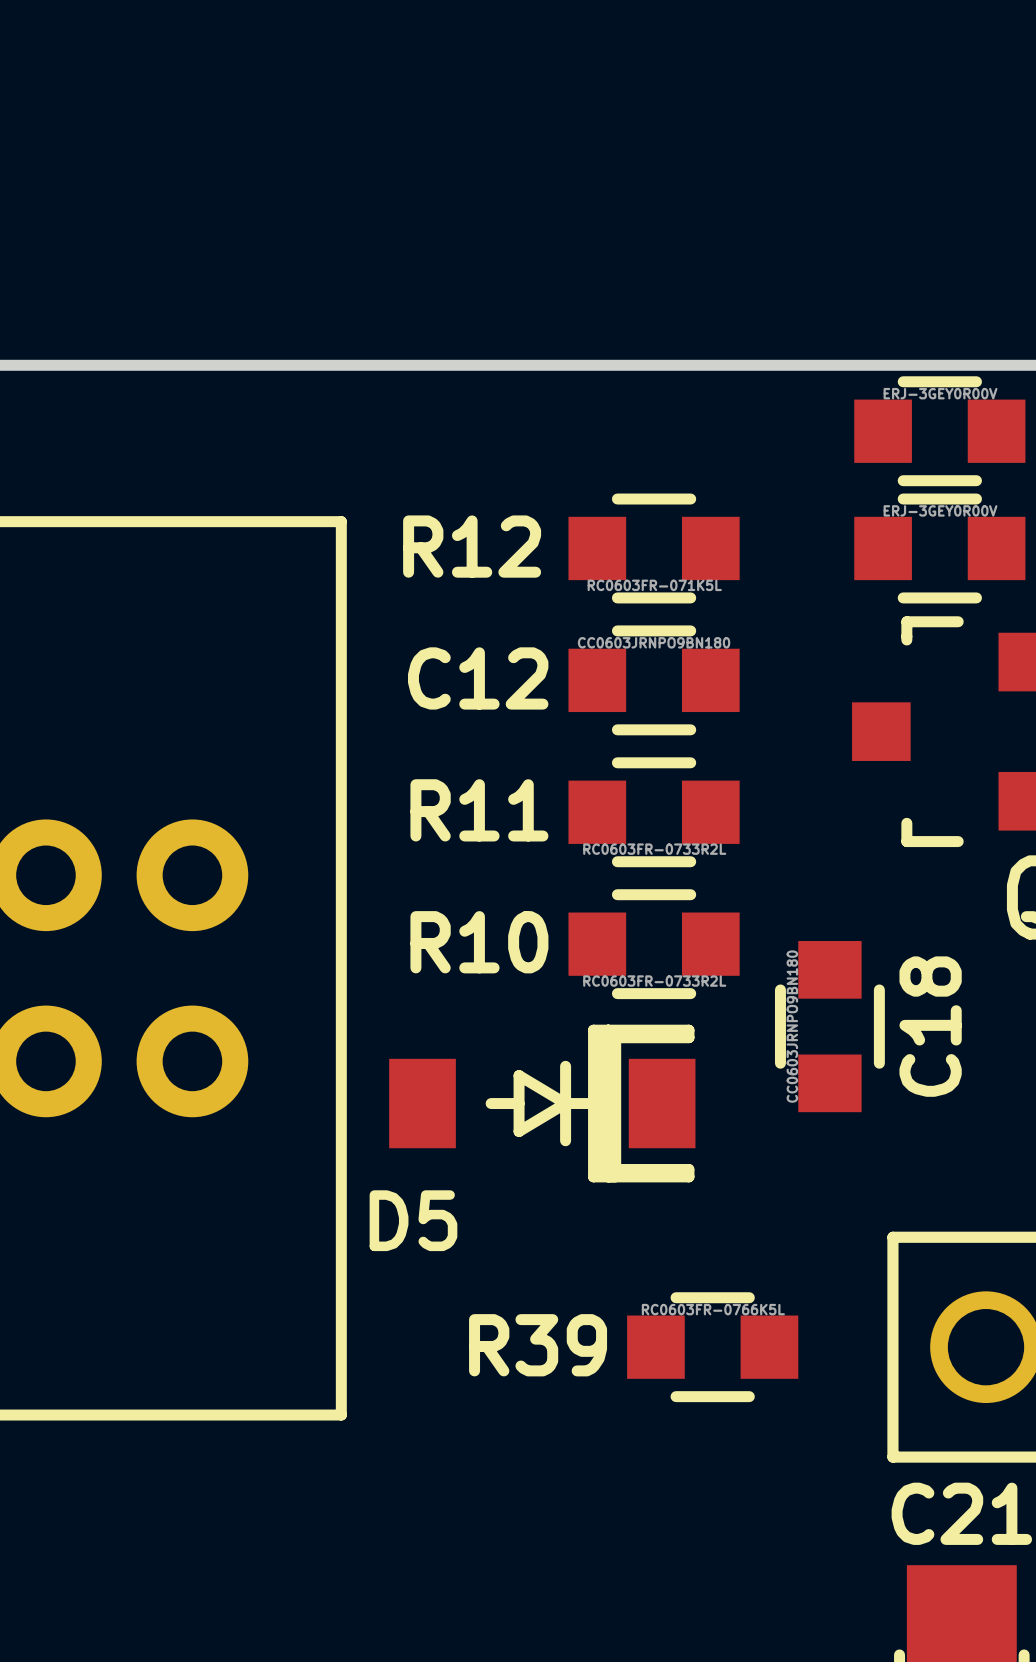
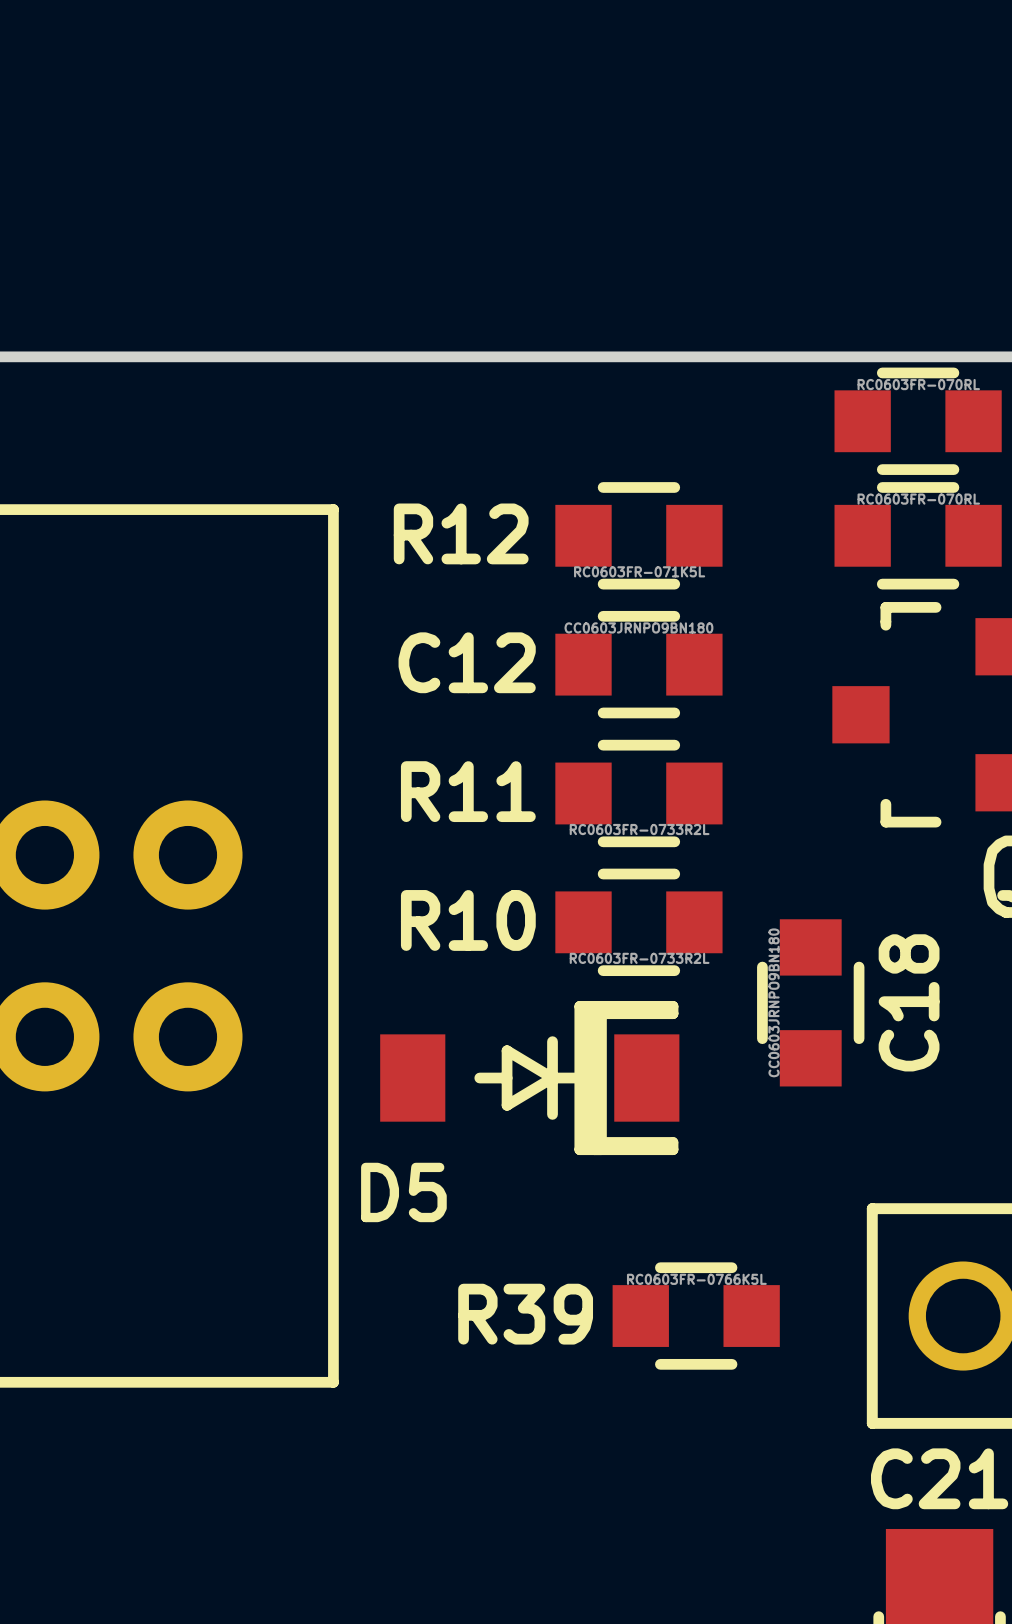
part value: ERJ-3GEY0R00V (940, 393) -> RC0603FR-070RL (918, 384)
part value: ERJ-3GEY0R00V (940, 510) -> RC0603FR-070RL (918, 499)

